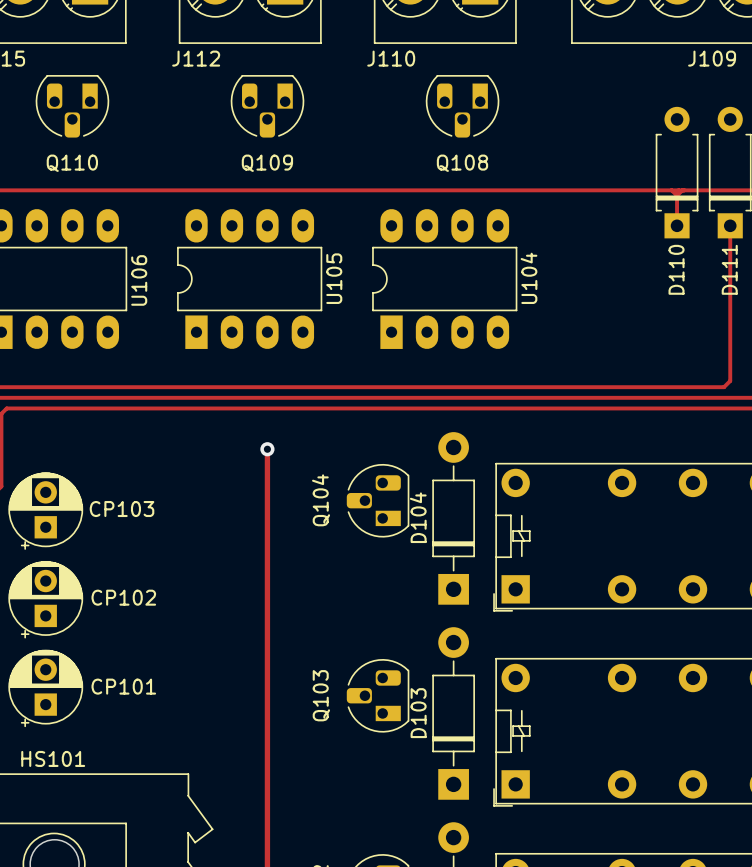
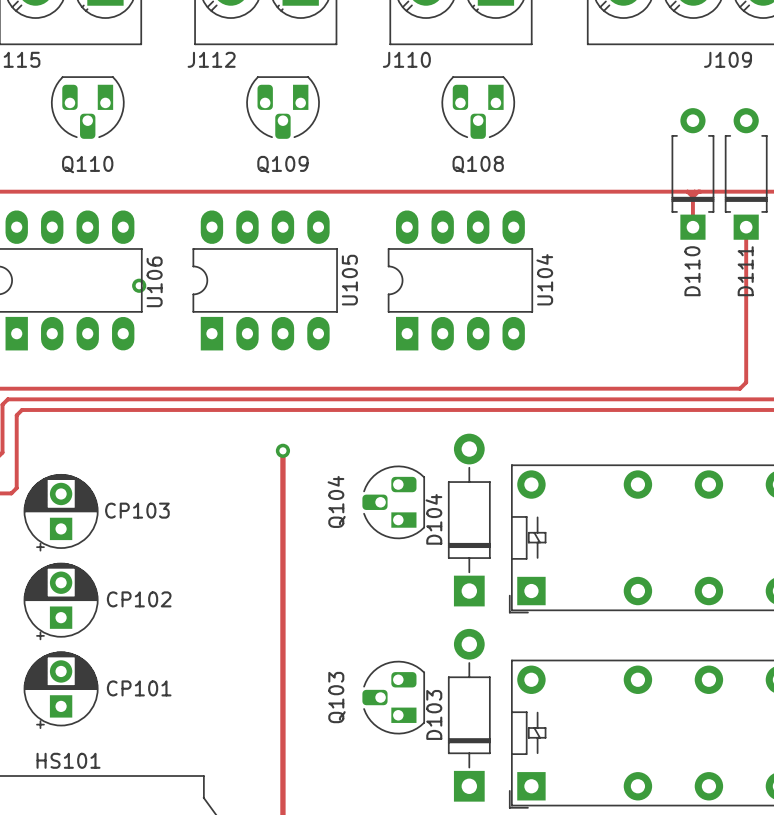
via: none -> (139, 285)

